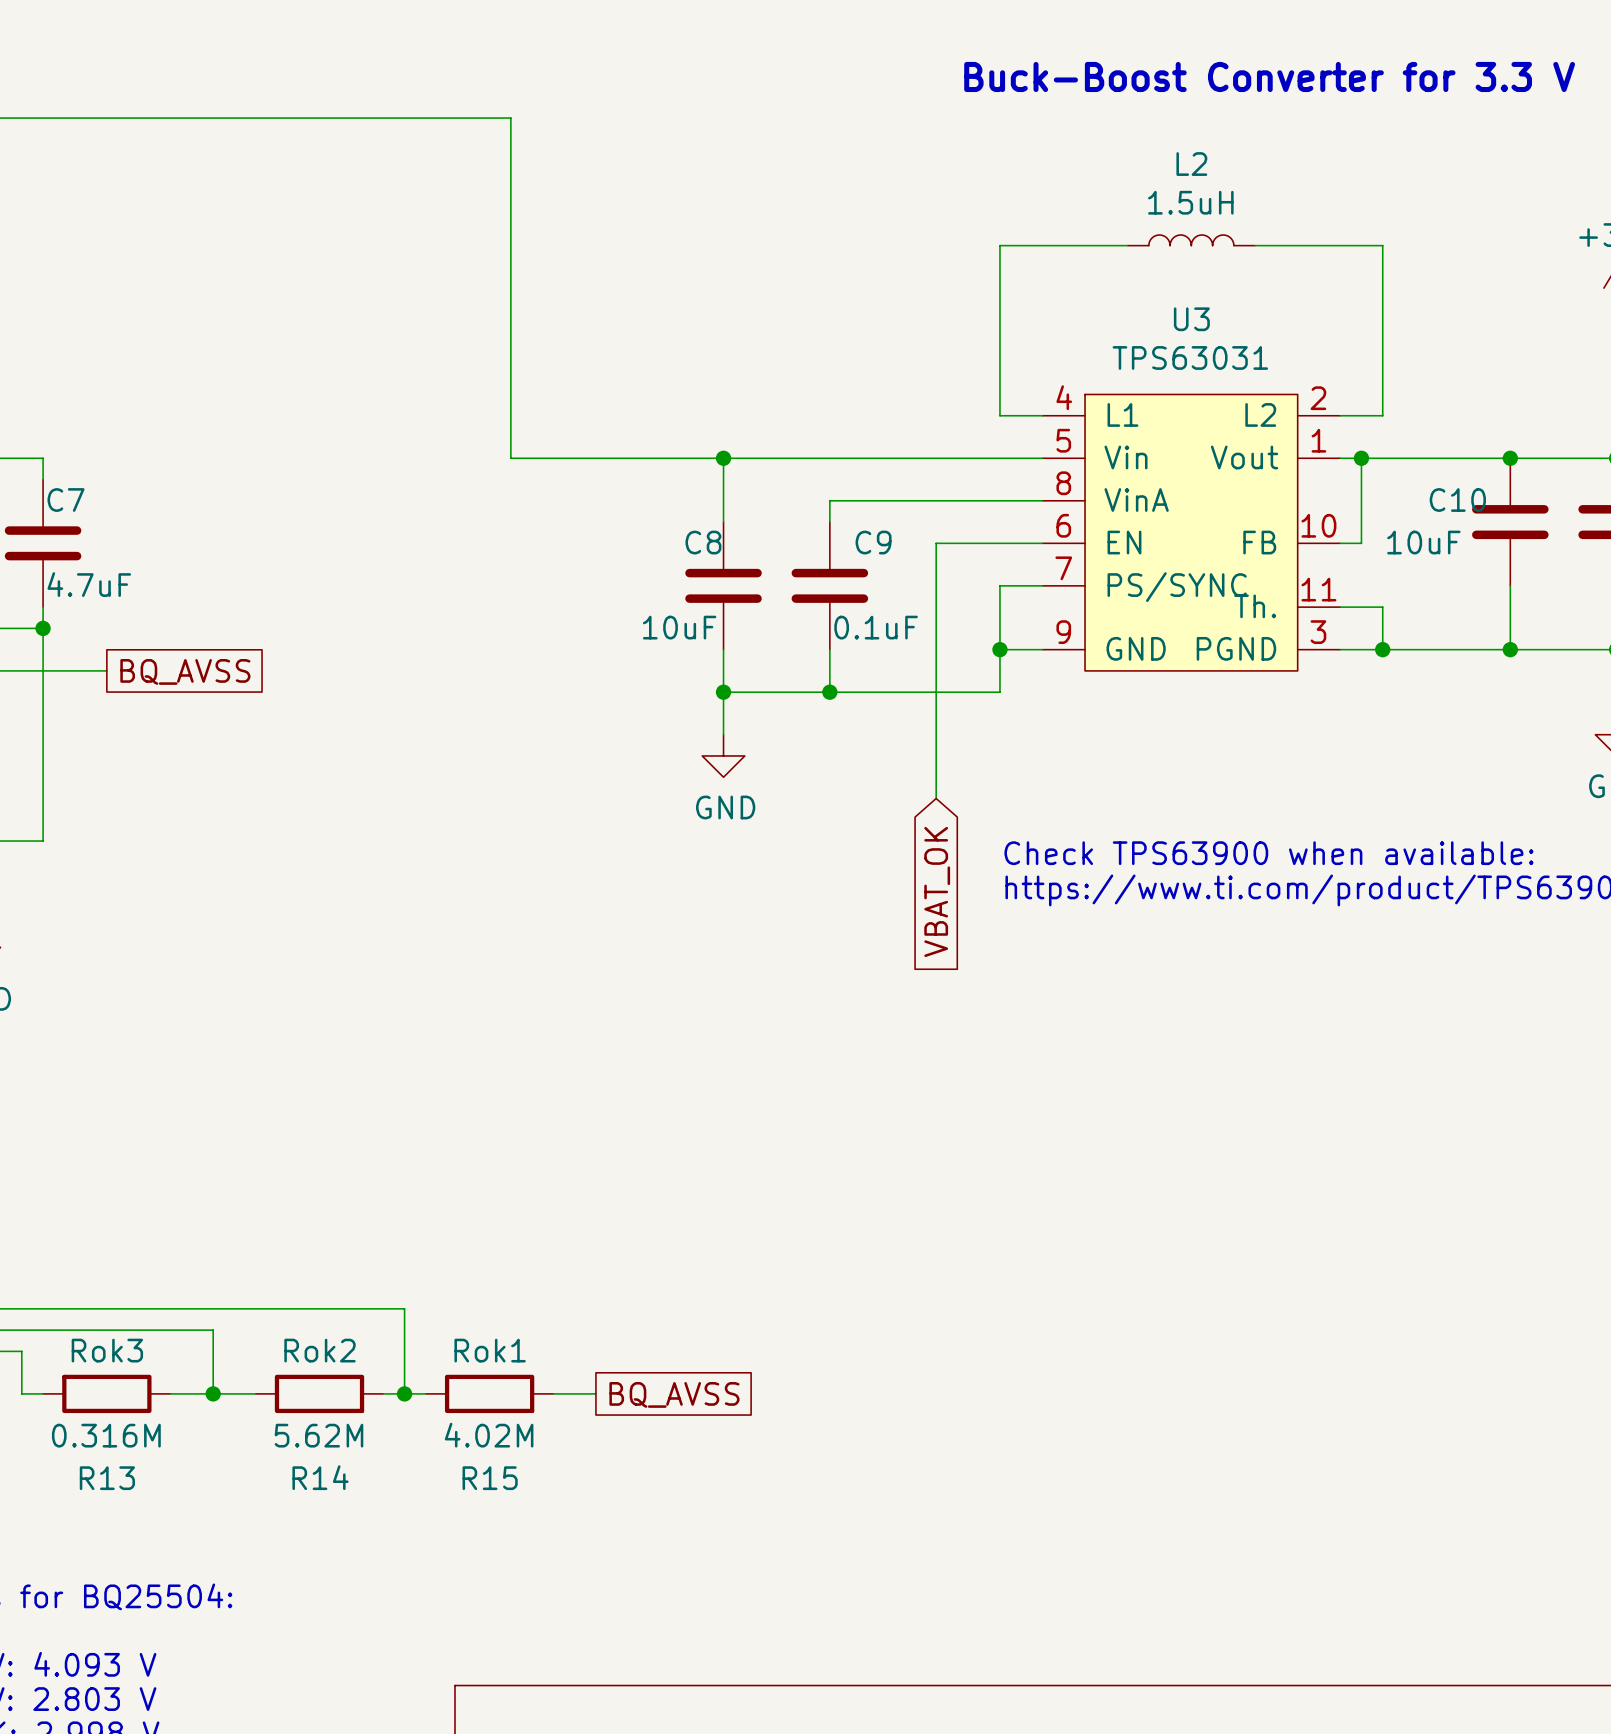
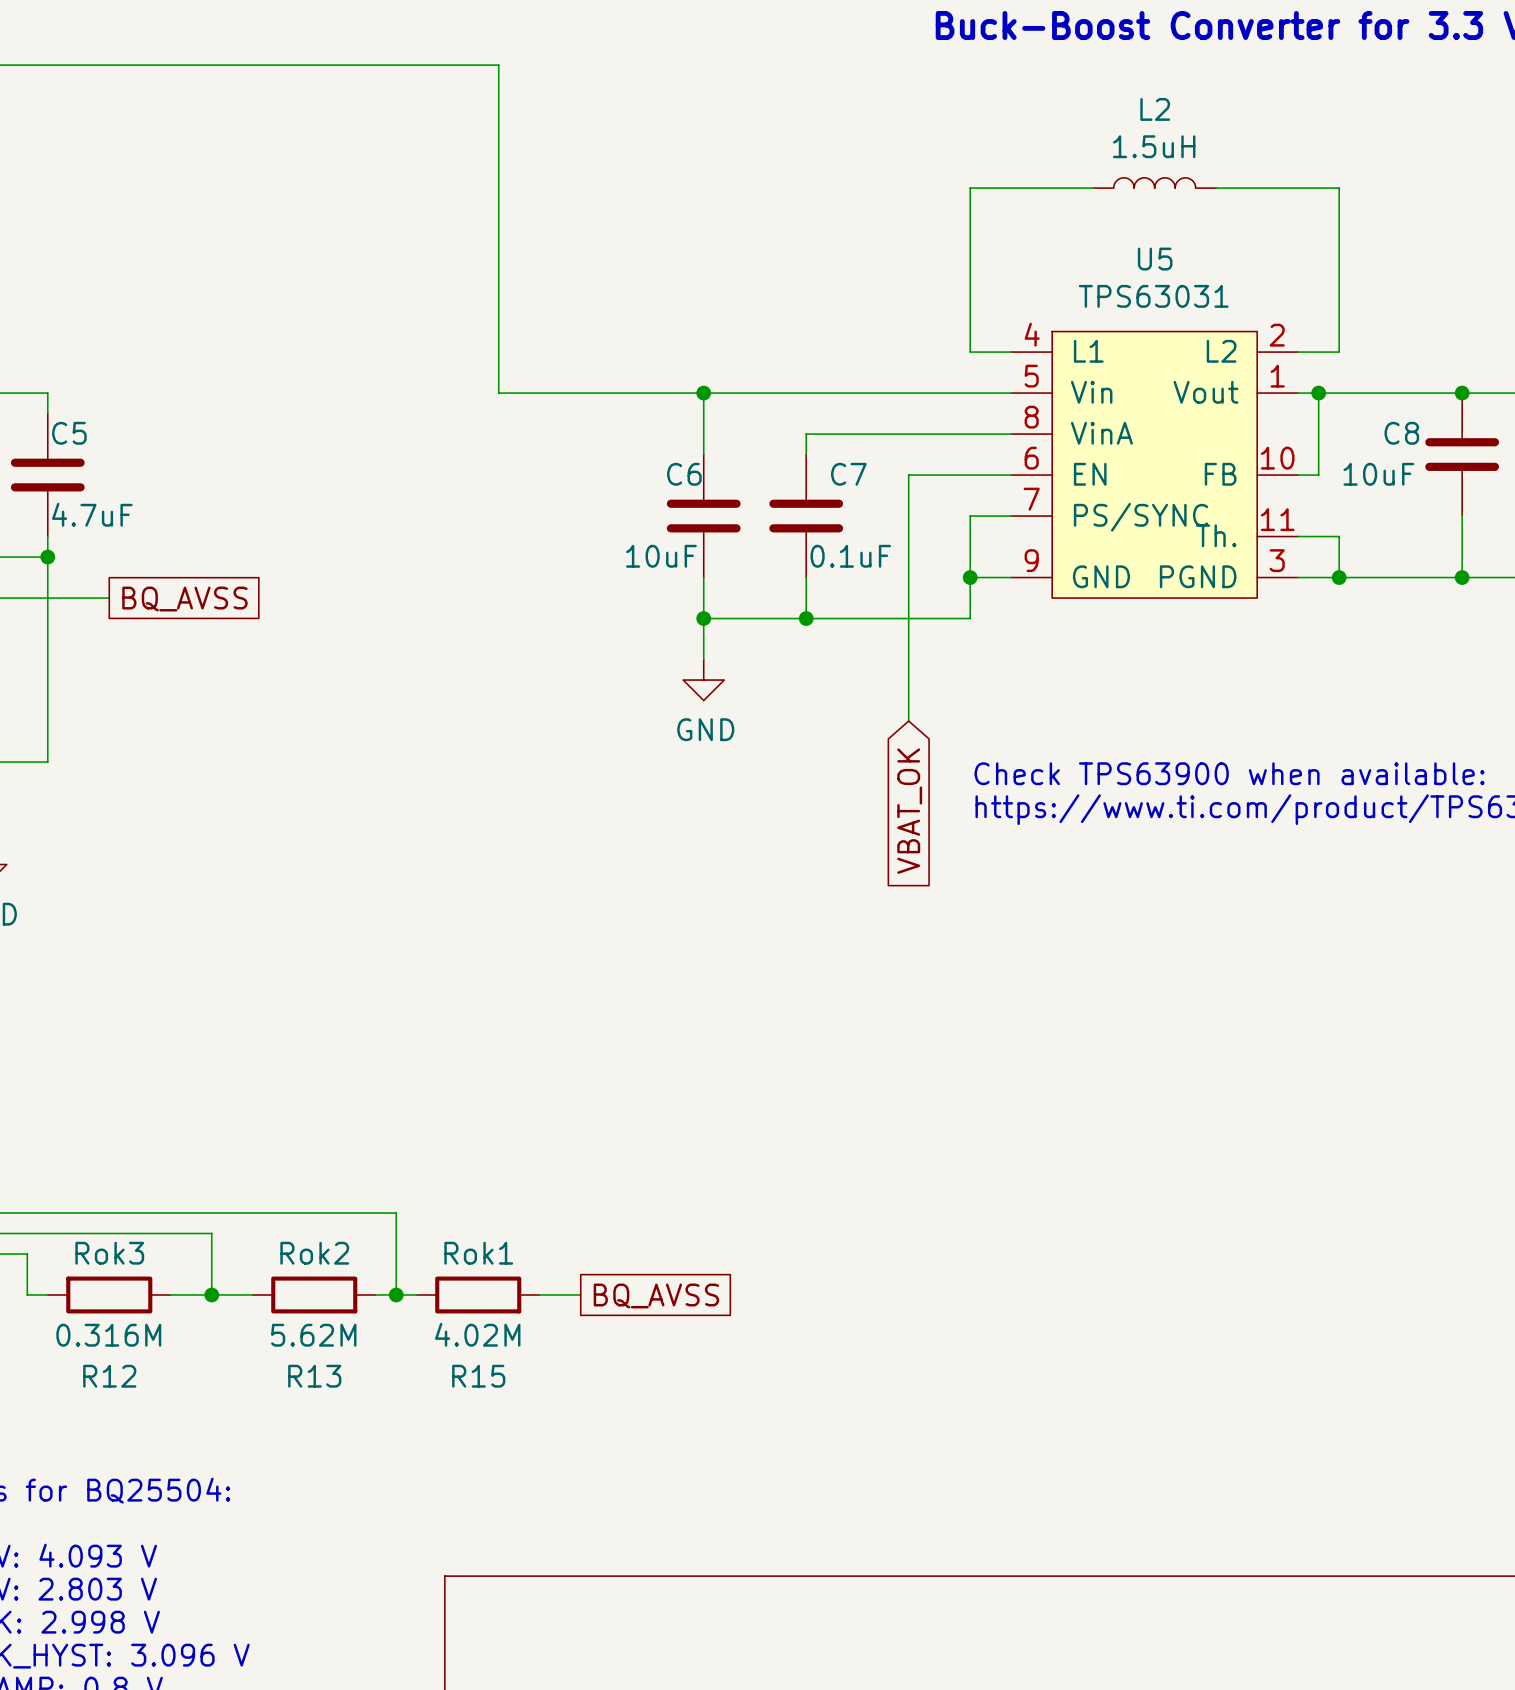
U3 name: U3 (1191, 319) -> U5 (1155, 259)
C7 name: C7 (66, 500) -> C5 (69, 433)
C10 name: C10 (1457, 500) -> C8 (1401, 433)
C8 name: C8 (703, 542) -> C6 (684, 474)
C9 name: C9 (873, 542) -> C7 (848, 474)
R14 name: R14 (320, 1477) -> R13 (314, 1376)
R13 name: R13 (107, 1478) -> R12 (109, 1376)

